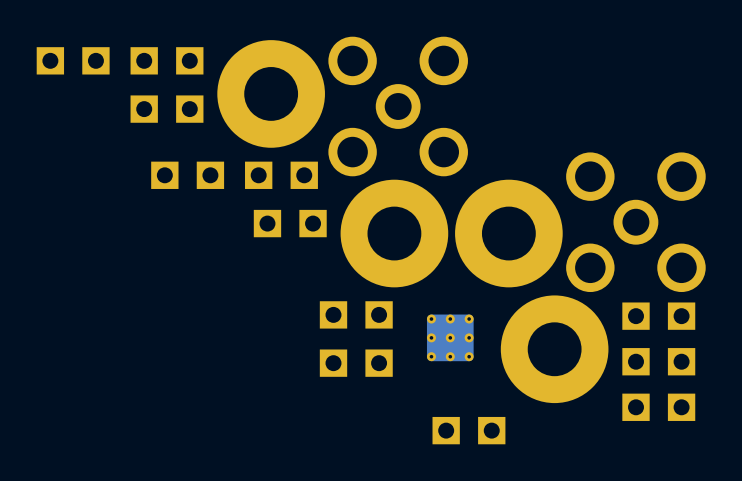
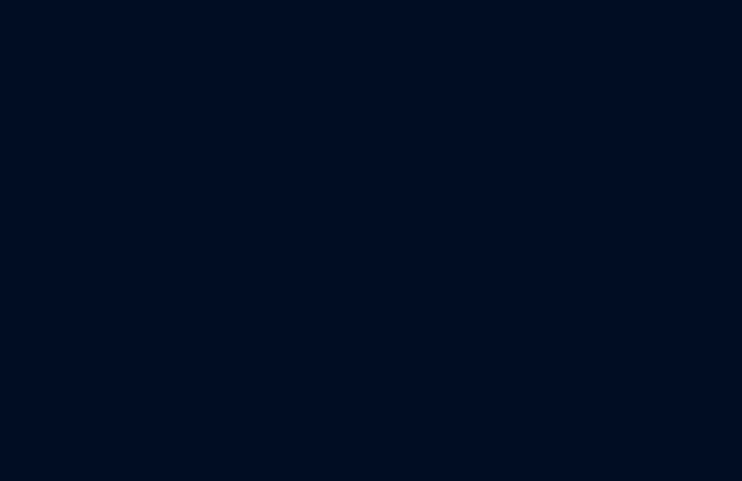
part: (73, 60) -> none
part: (166, 60) -> none
part: (271, 93) -> none
part: (398, 106) -> none
part: (166, 109) -> none
part: (187, 175) -> none
part: (281, 175) -> none
part: (635, 222) -> none
part: (290, 223) -> none
part: (394, 233) -> none
part: (508, 233) -> none
part: (356, 314) -> none
part: (450, 337) -> none
part: (554, 349) -> none
part: (658, 361) -> none
part: (356, 363) -> none
part: (468, 430) -> none

